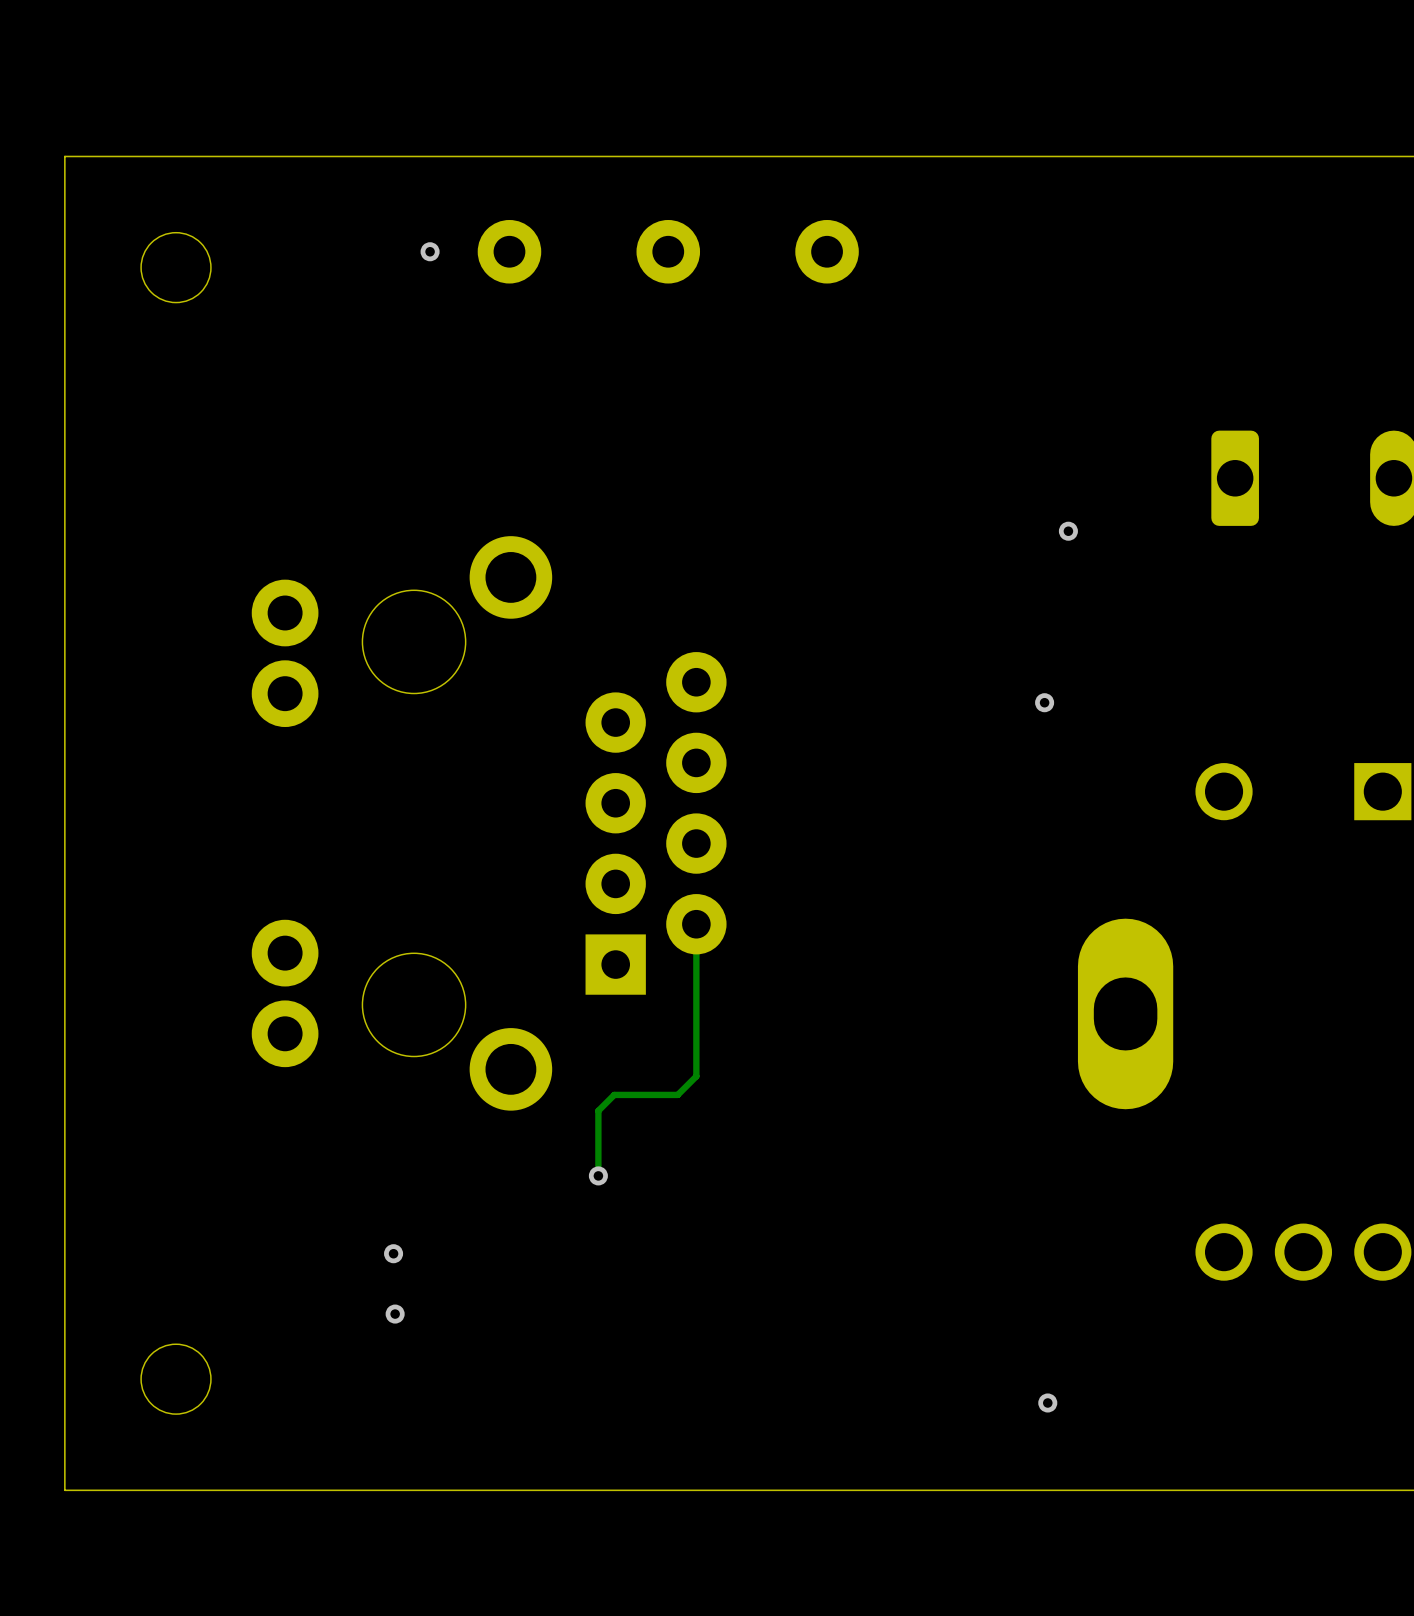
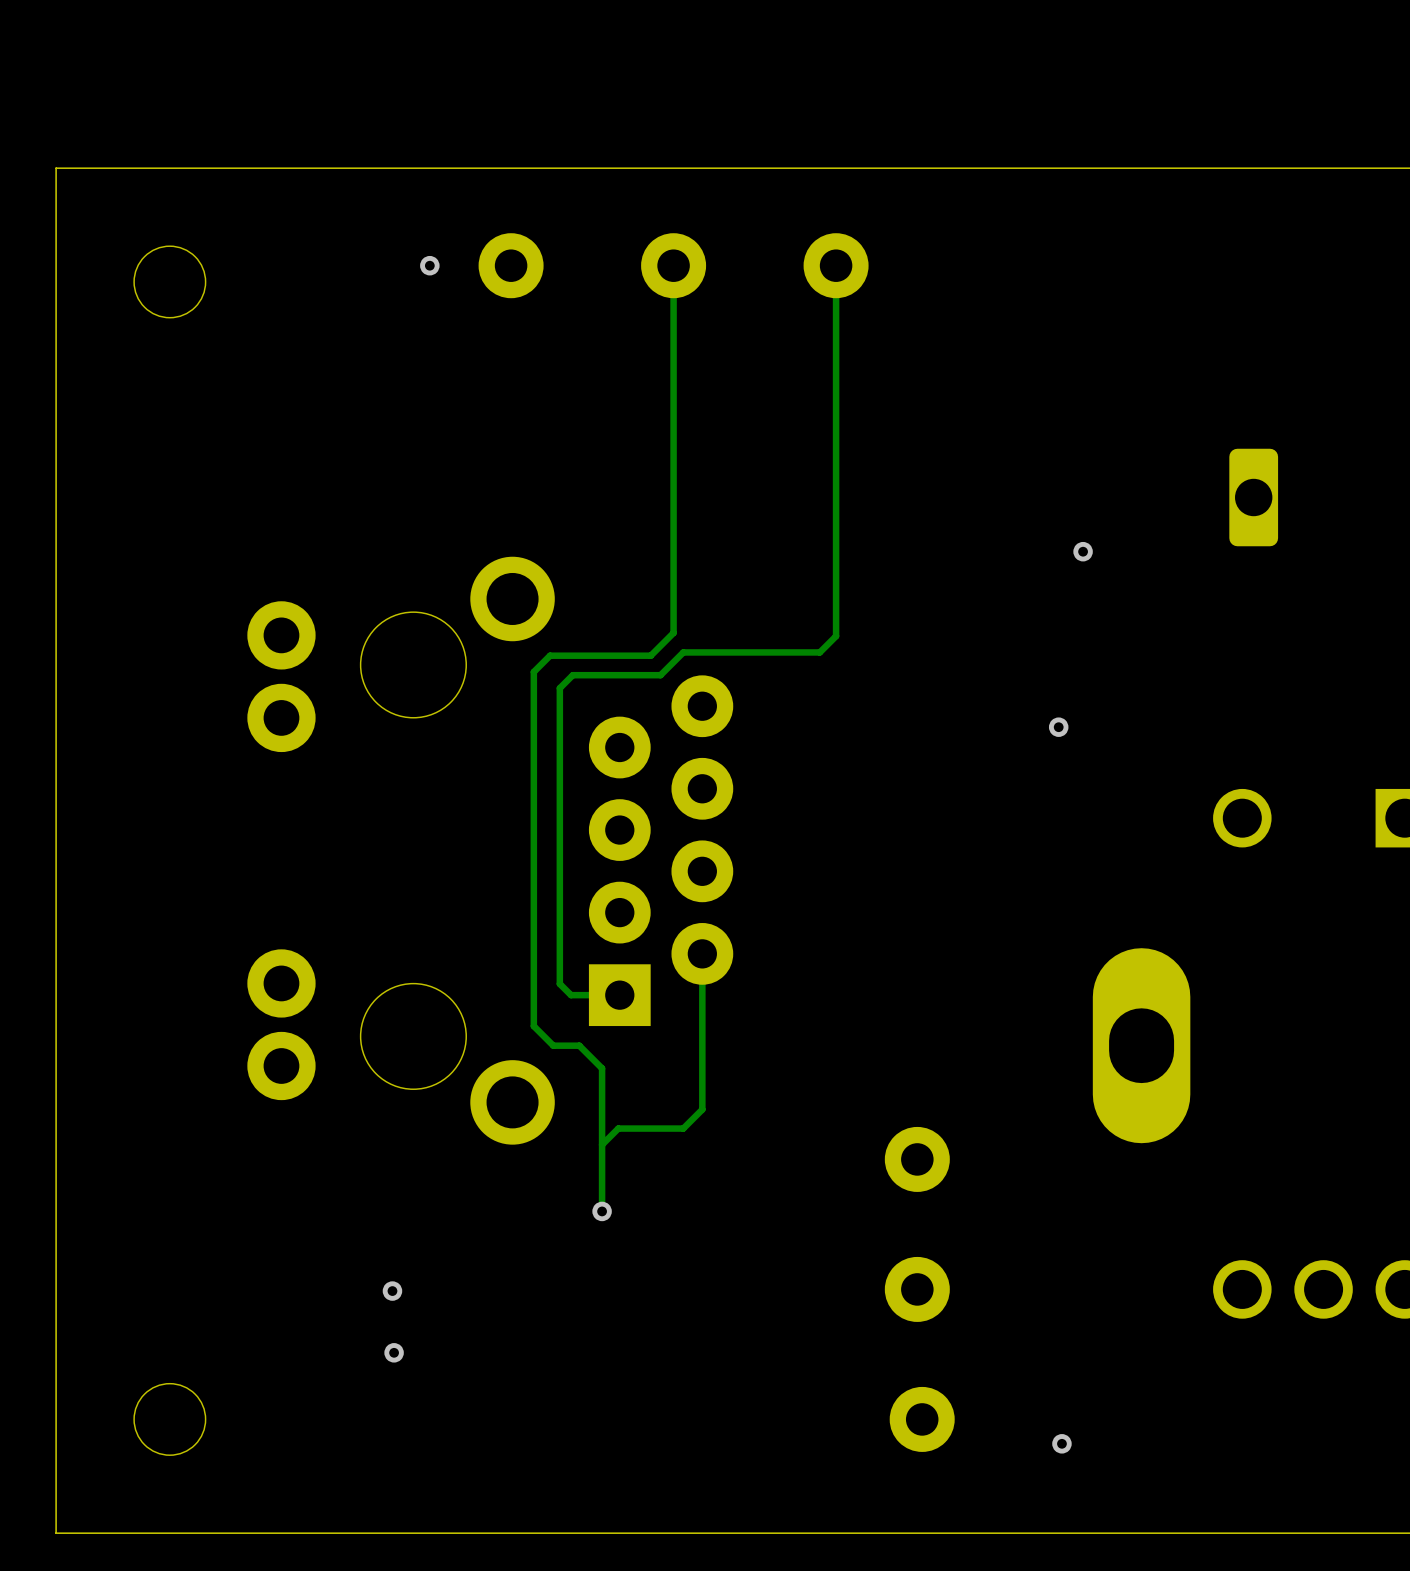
track: none -> (673, 265) (673, 632) (650, 655) (550, 655) (533, 671) (533, 1026) (553, 1045) (579, 1045) (602, 1068) (602, 1144)
track: none -> (836, 265) (836, 636) (819, 652) (683, 652) (660, 675) (572, 675) (559, 688) (559, 983) (571, 995) (619, 995)
part: none -> (917, 1159)
part: none -> (917, 1289)
part: none -> (922, 1419)

